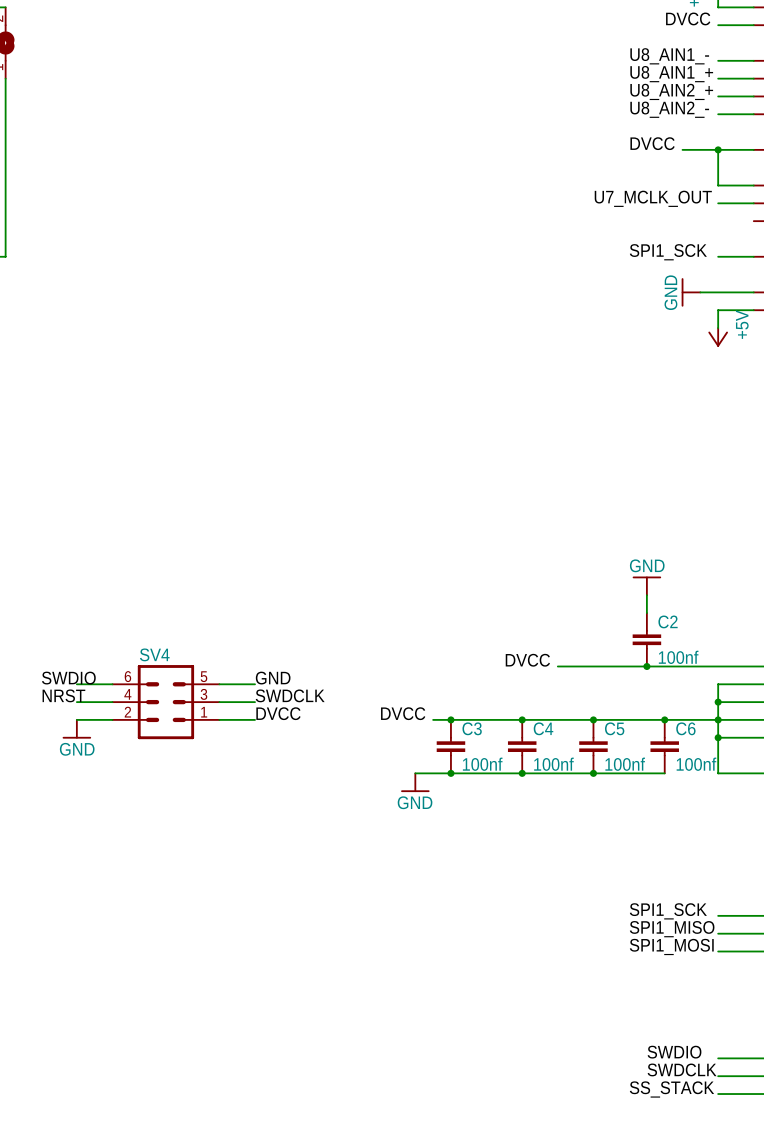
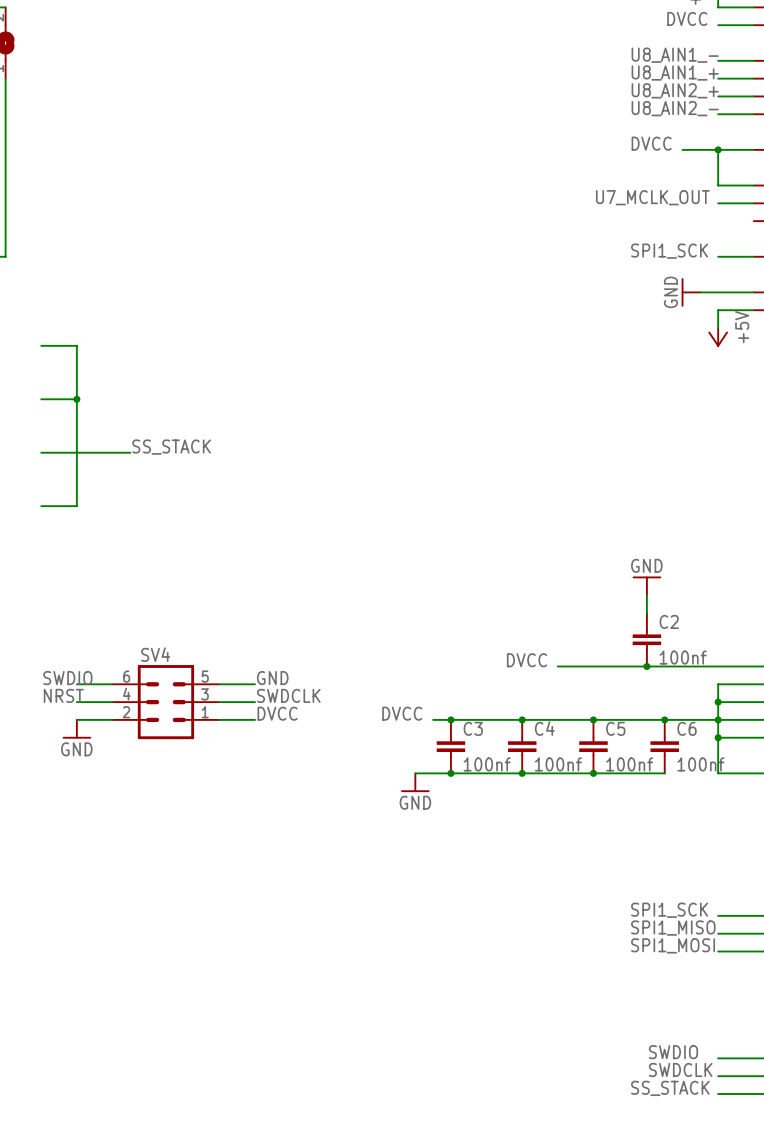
wire: none -> (41, 345) (76, 345) (76, 506) (41, 506)
wire: none -> (41, 399) (76, 399)
junction: none -> (76, 399)
label: none -> SS_STACK (171, 447)
wire: none -> (41, 452) (130, 452)

